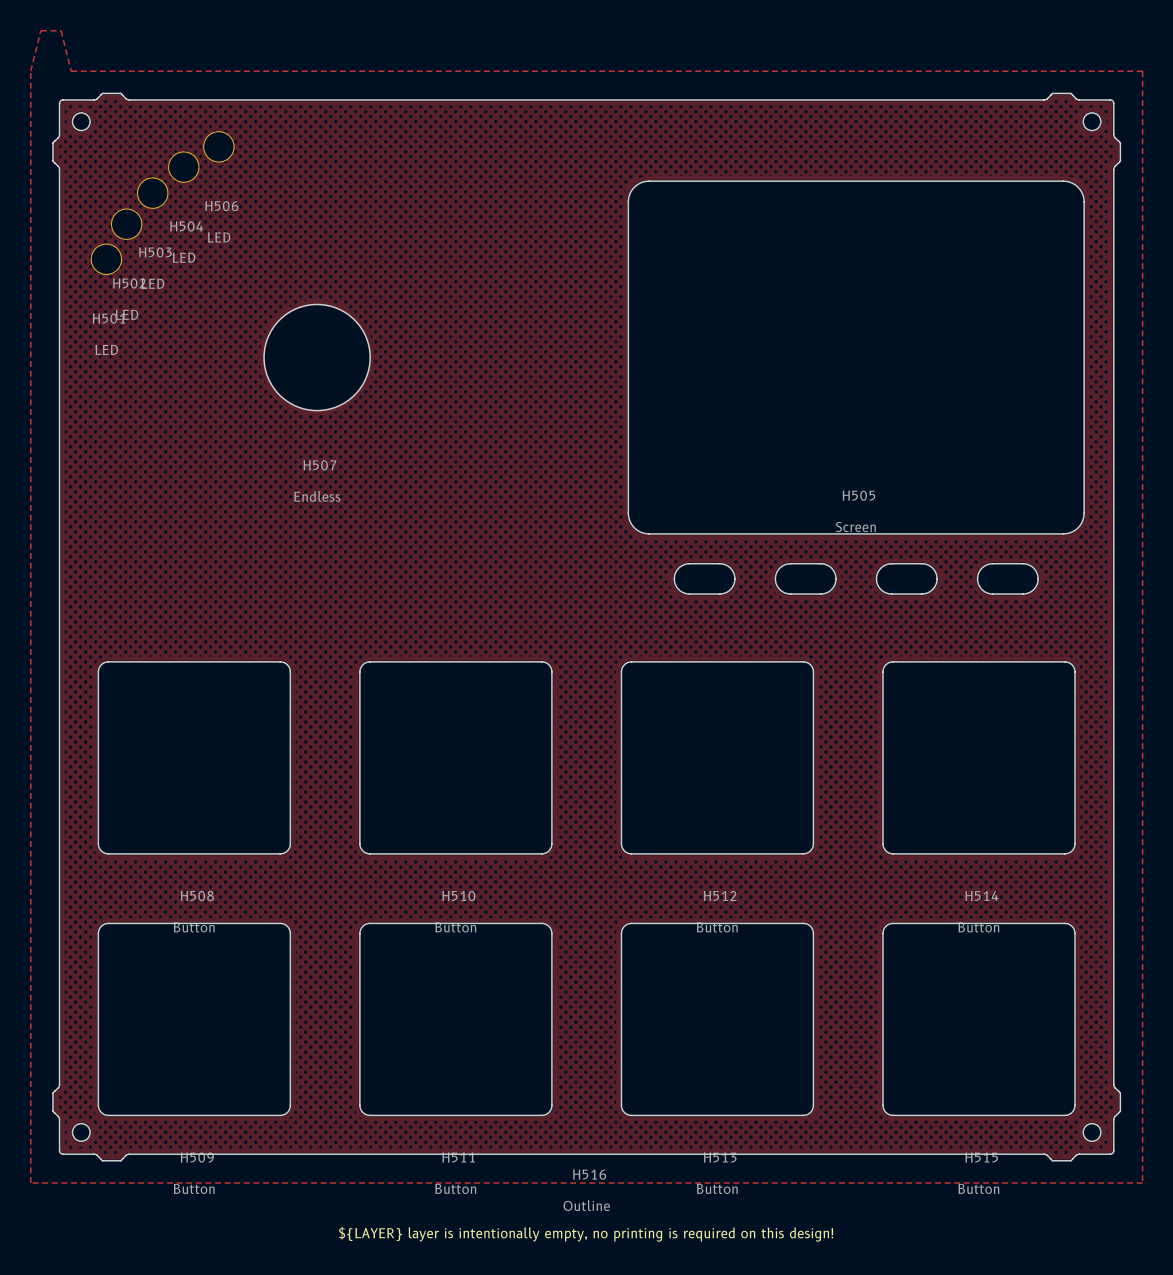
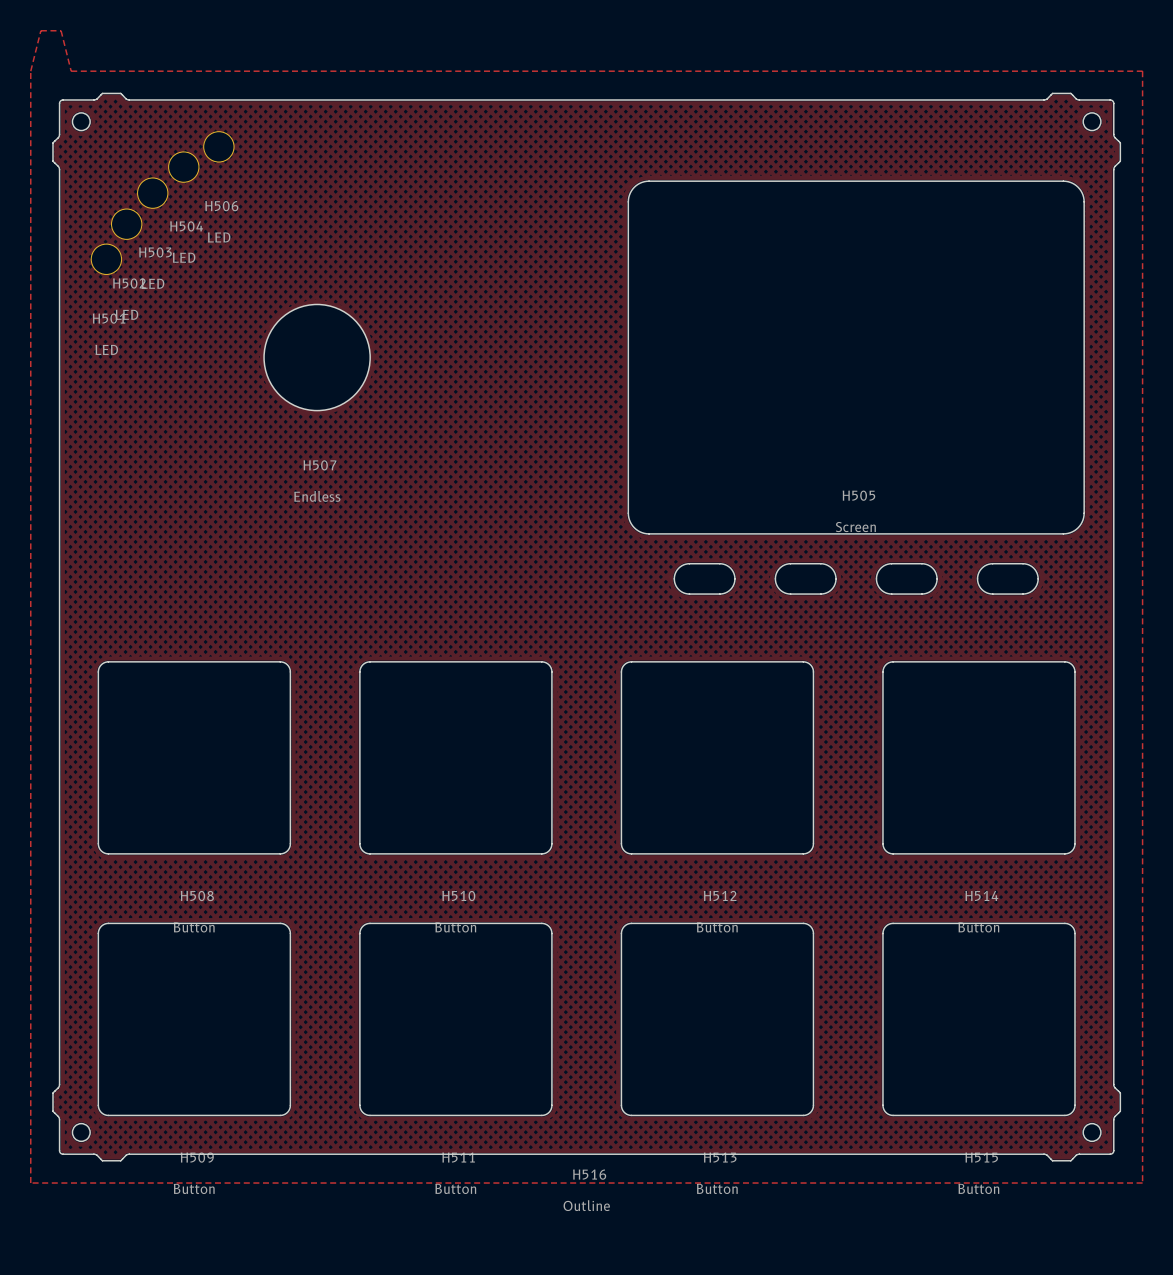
text: ${LAYER} layer is intentionally empty, no printing is required on this design! (586, 1234) -> none

